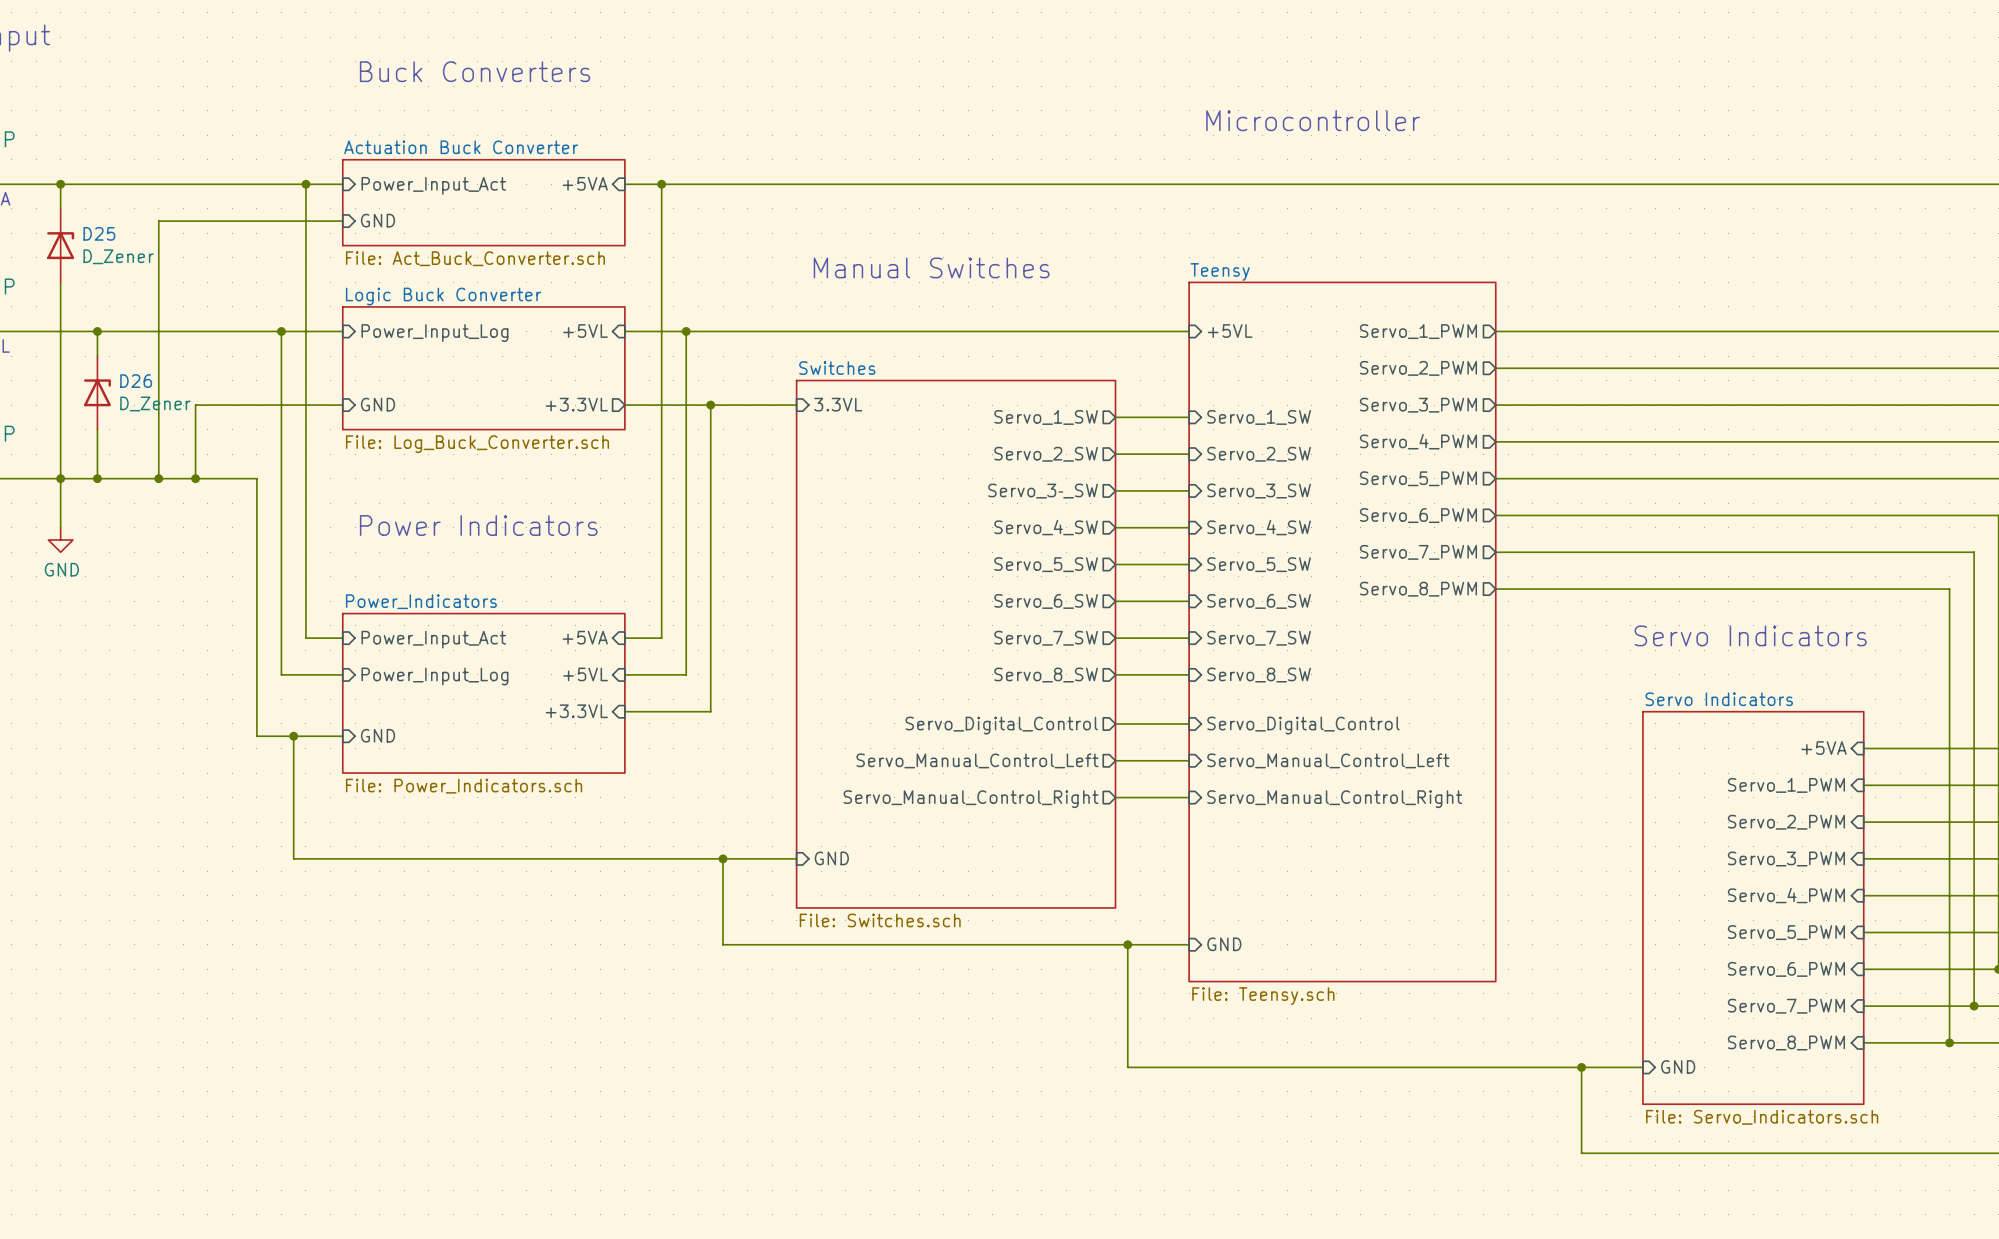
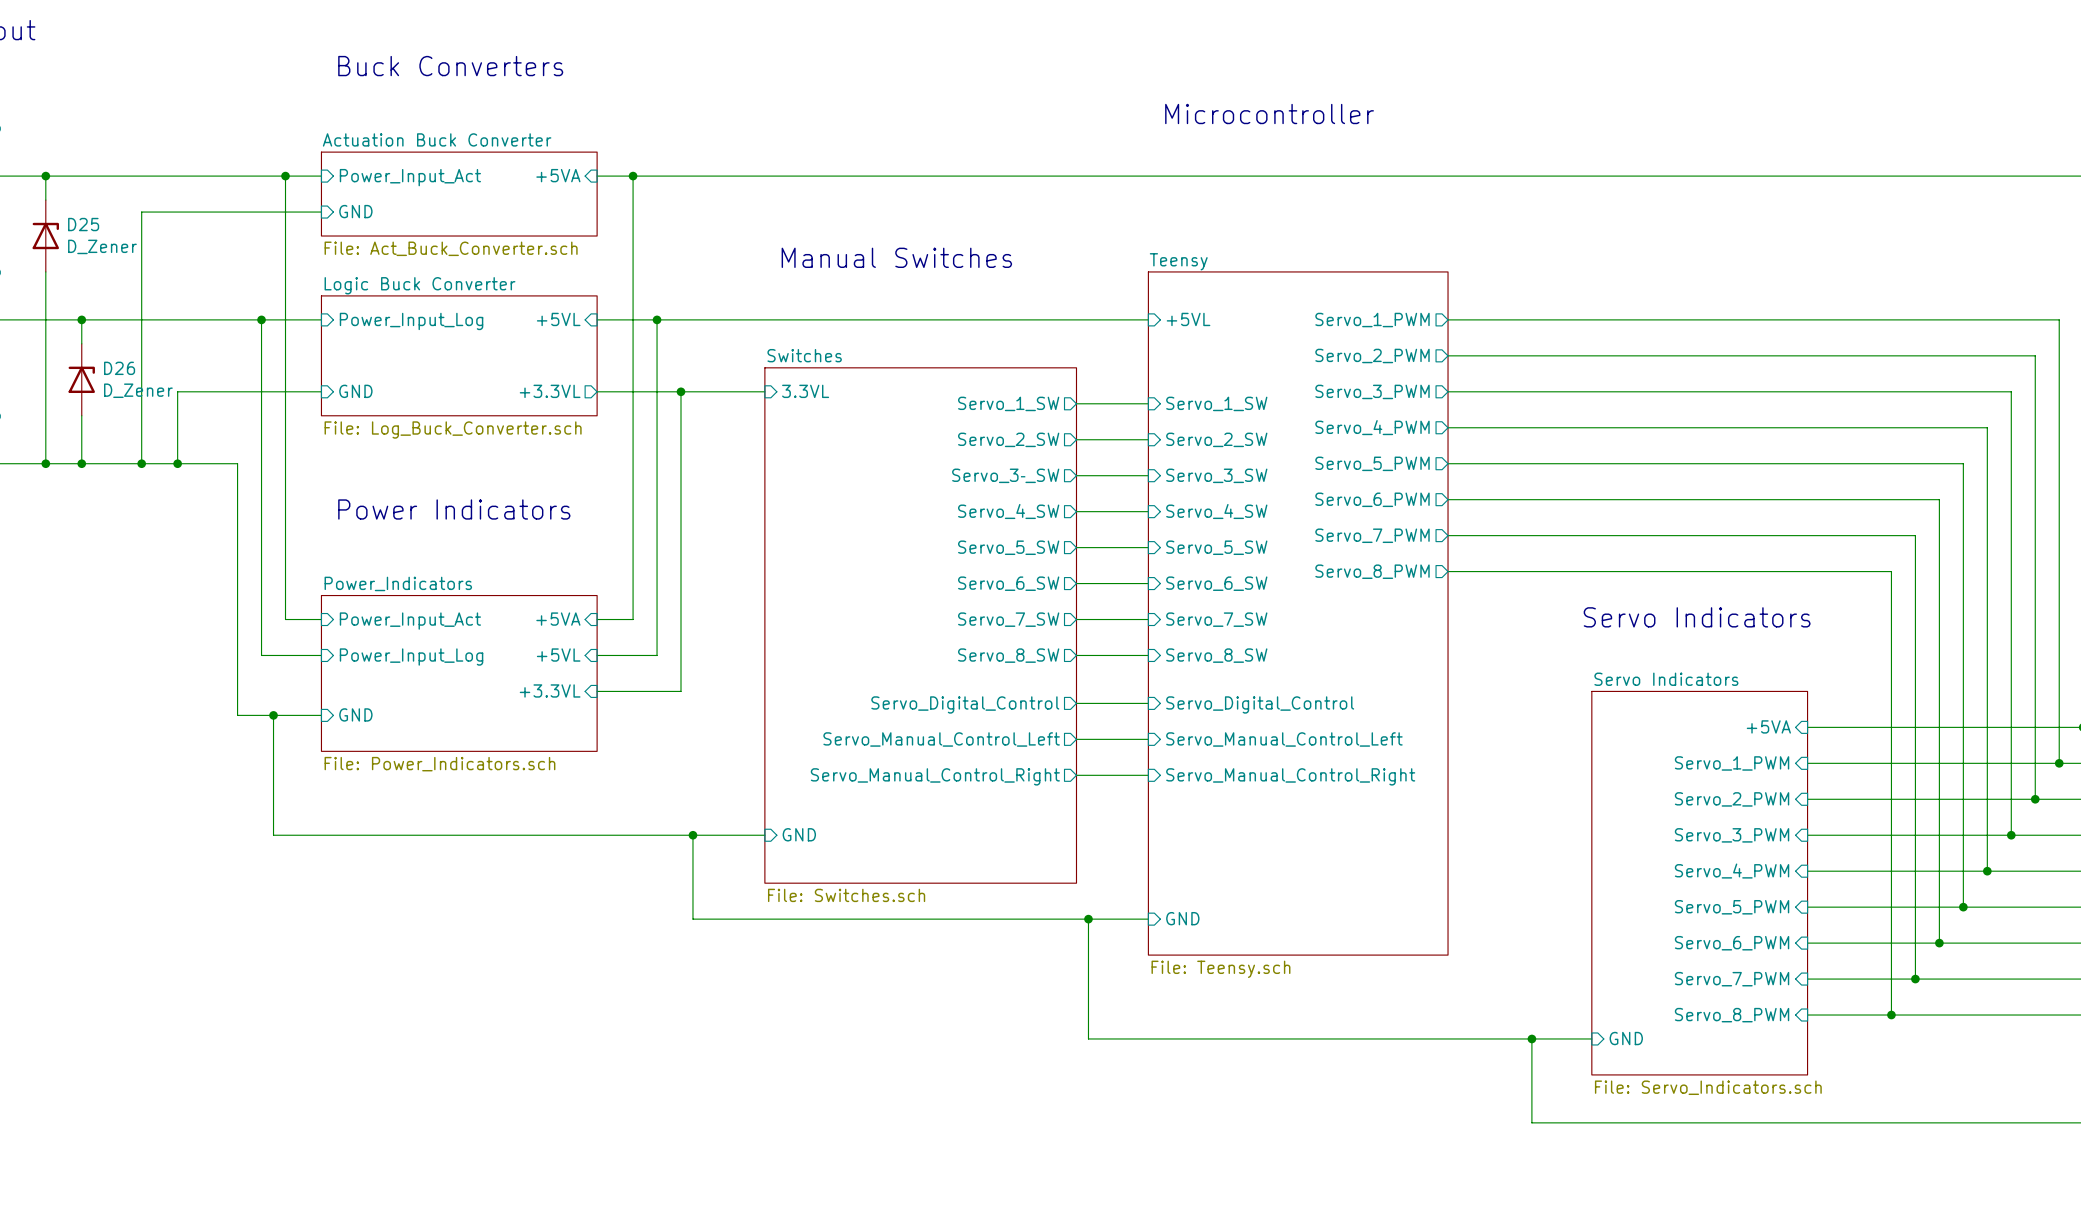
wire: (60, 478) (60, 527) -> none
power symbol: GND (60, 539) -> none

